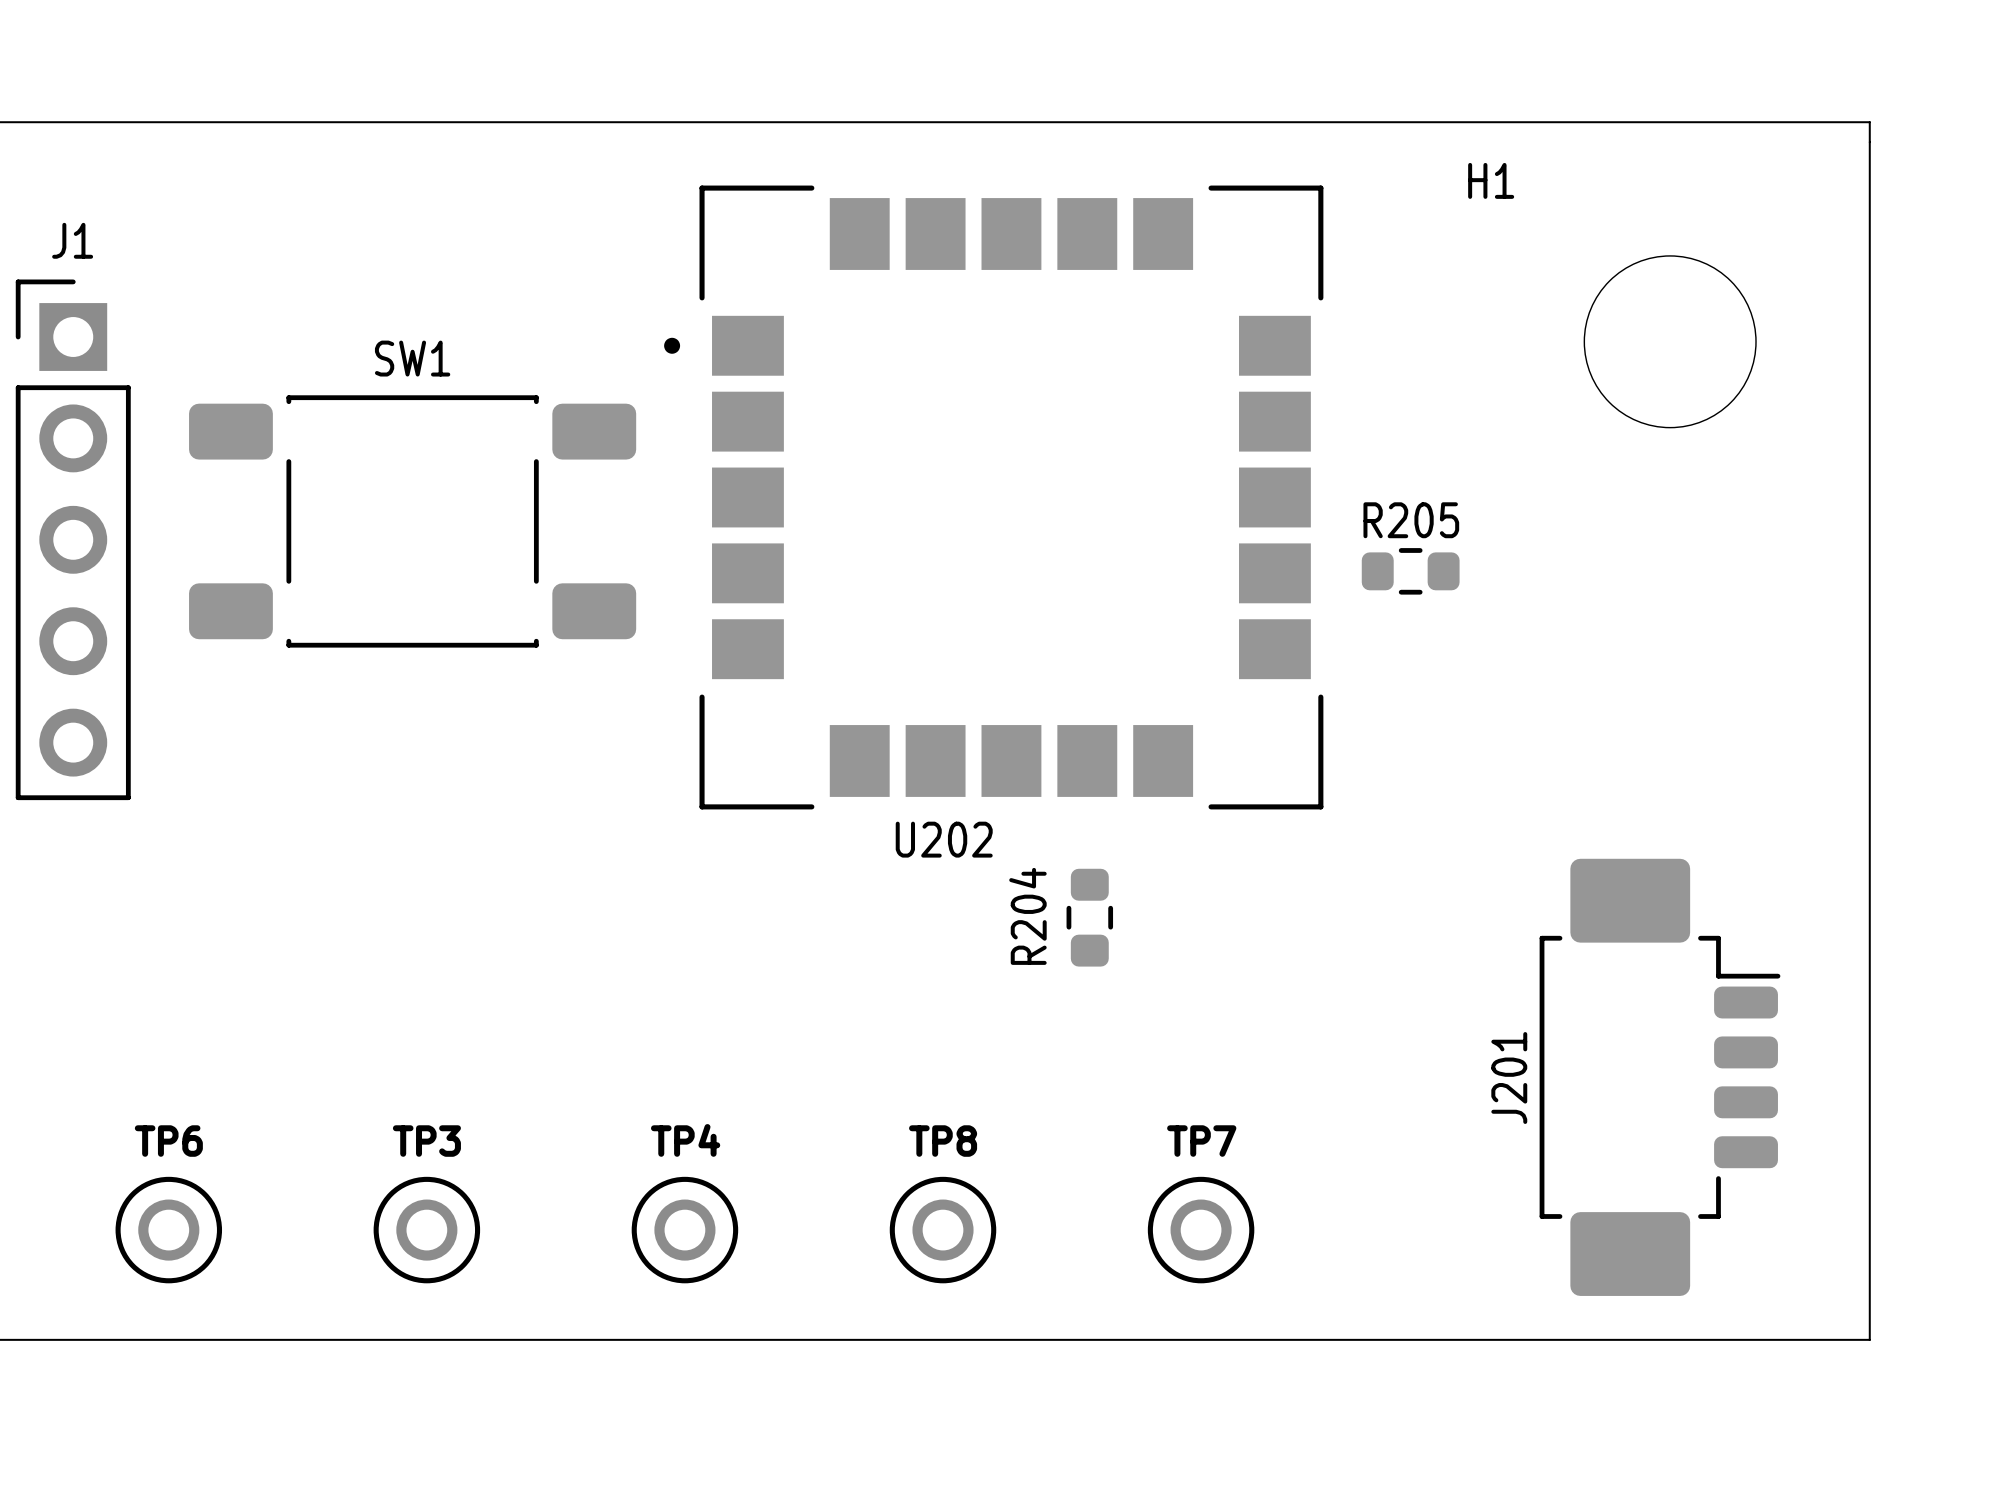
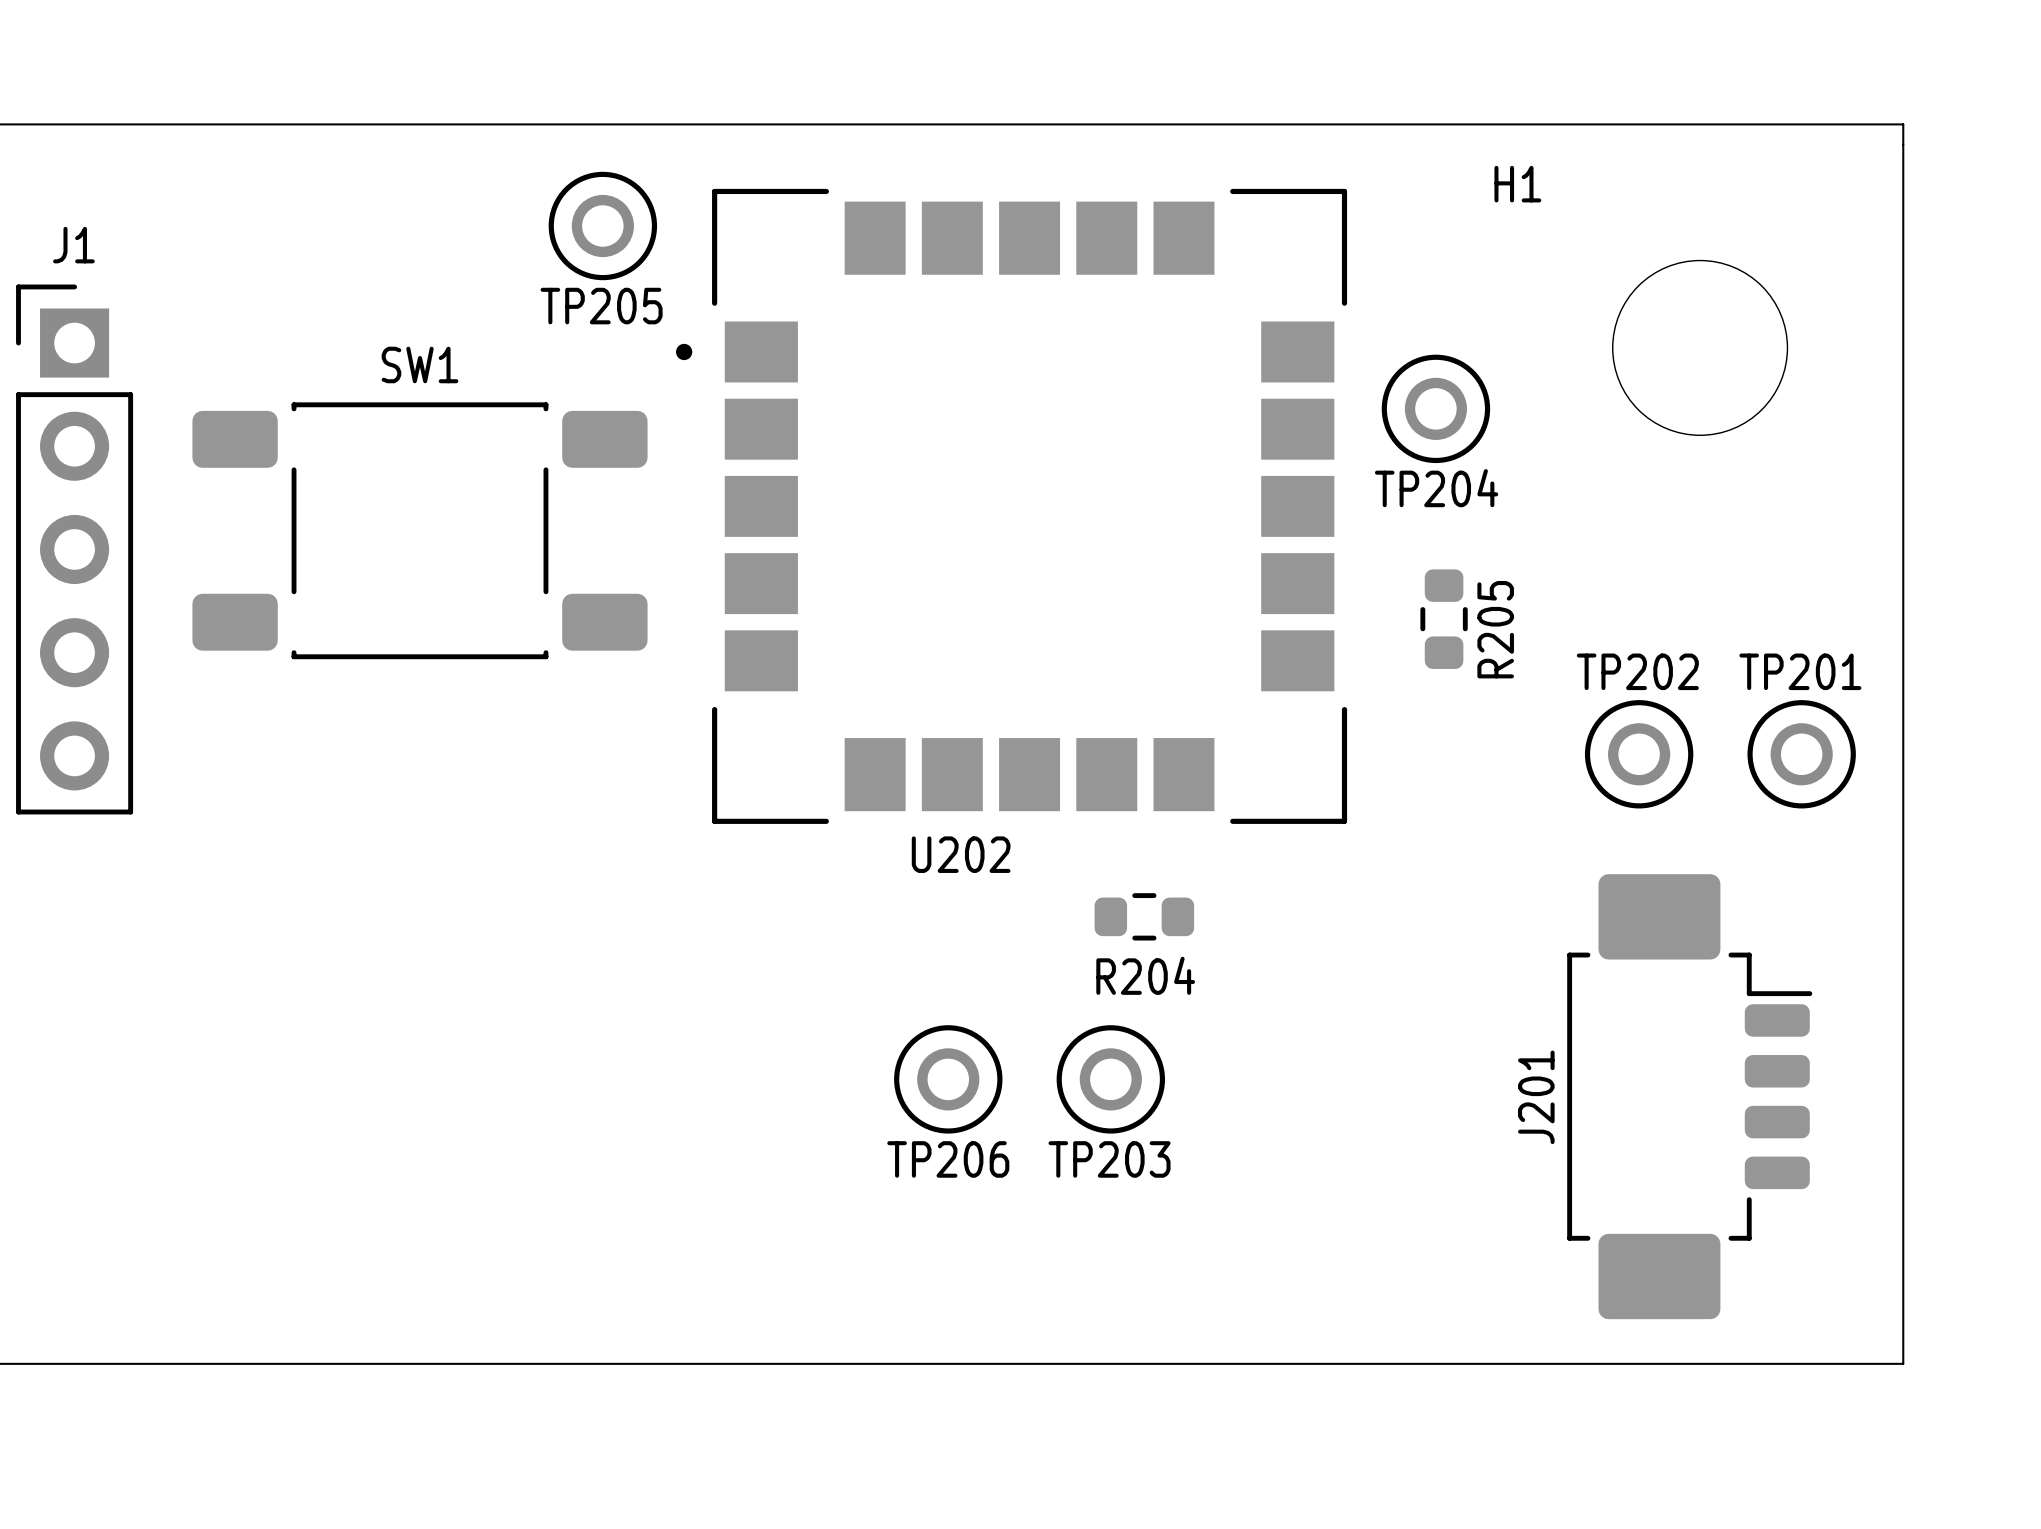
TP205: none -> (602, 226)
TP204: none -> (1435, 408)
R205 rotation: 0° (1410, 571) -> 90° clockwise (1444, 619)
TP202: none -> (1639, 754)
TP201: none -> (1801, 754)
R204 name position: R204 (1027, 916) -> R204 (1145, 975)
R204 rotation: 0° (1089, 917) -> 90° clockwise (1144, 916)
TP206: none -> (948, 1079)
TP203: none -> (1110, 1079)
TP6: (168, 1230) -> none
TP3: (426, 1230) -> none
TP4: (684, 1230) -> none
TP8: (943, 1230) -> none
TP7: (1201, 1230) -> none

